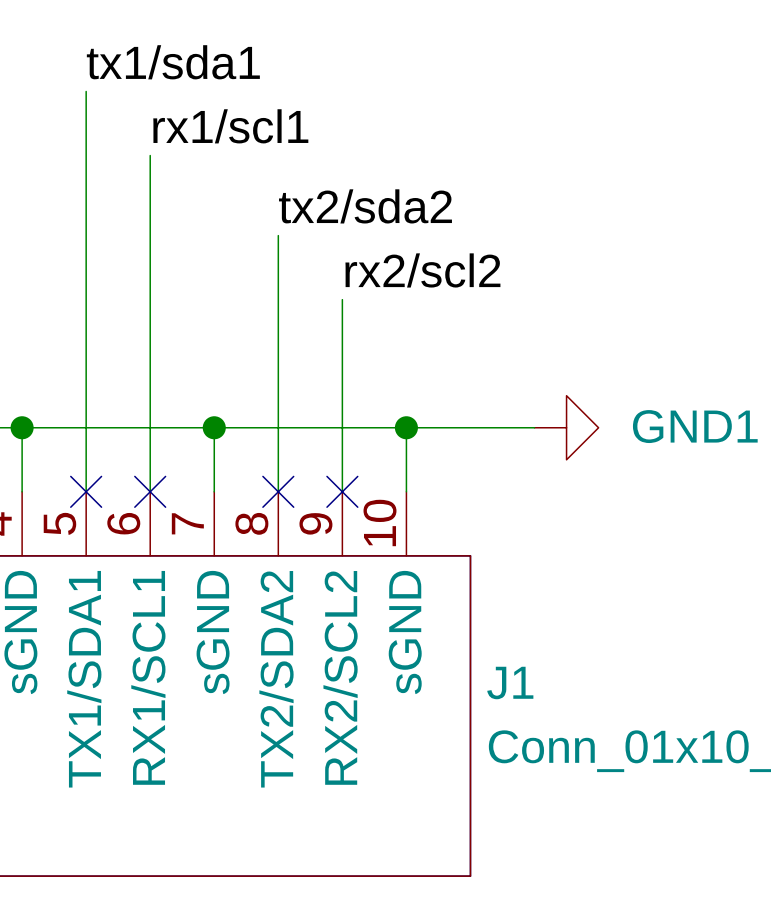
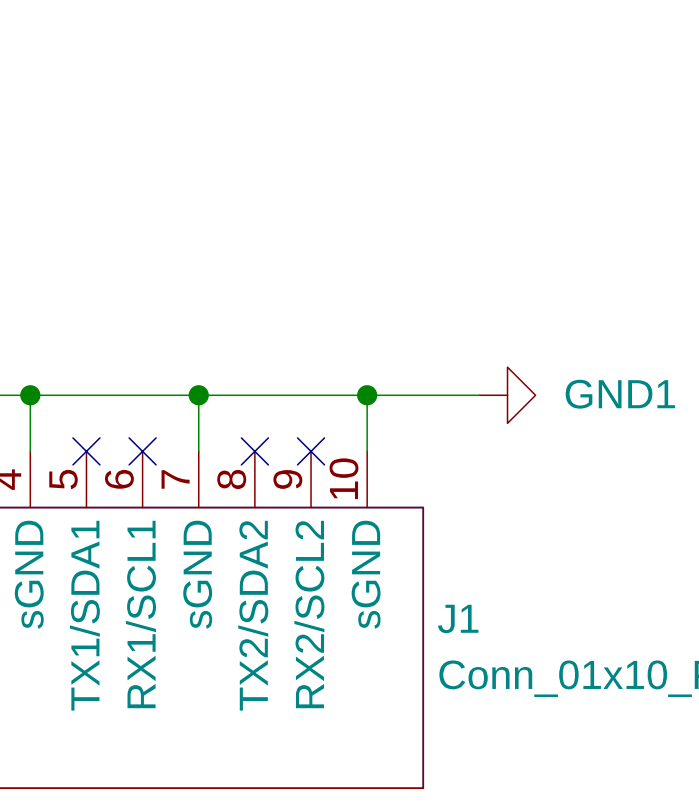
label: tx1/sda1 (173, 62) -> none
wire: (86, 91) (86, 491) -> none
label: rx1/scl1 (230, 126) -> none
wire: (150, 155) (150, 491) -> none
label: tx2/sda2 (365, 206) -> none
wire: (278, 235) (278, 491) -> none
label: rx2/scl2 (422, 270) -> none
wire: (342, 299) (342, 491) -> none

